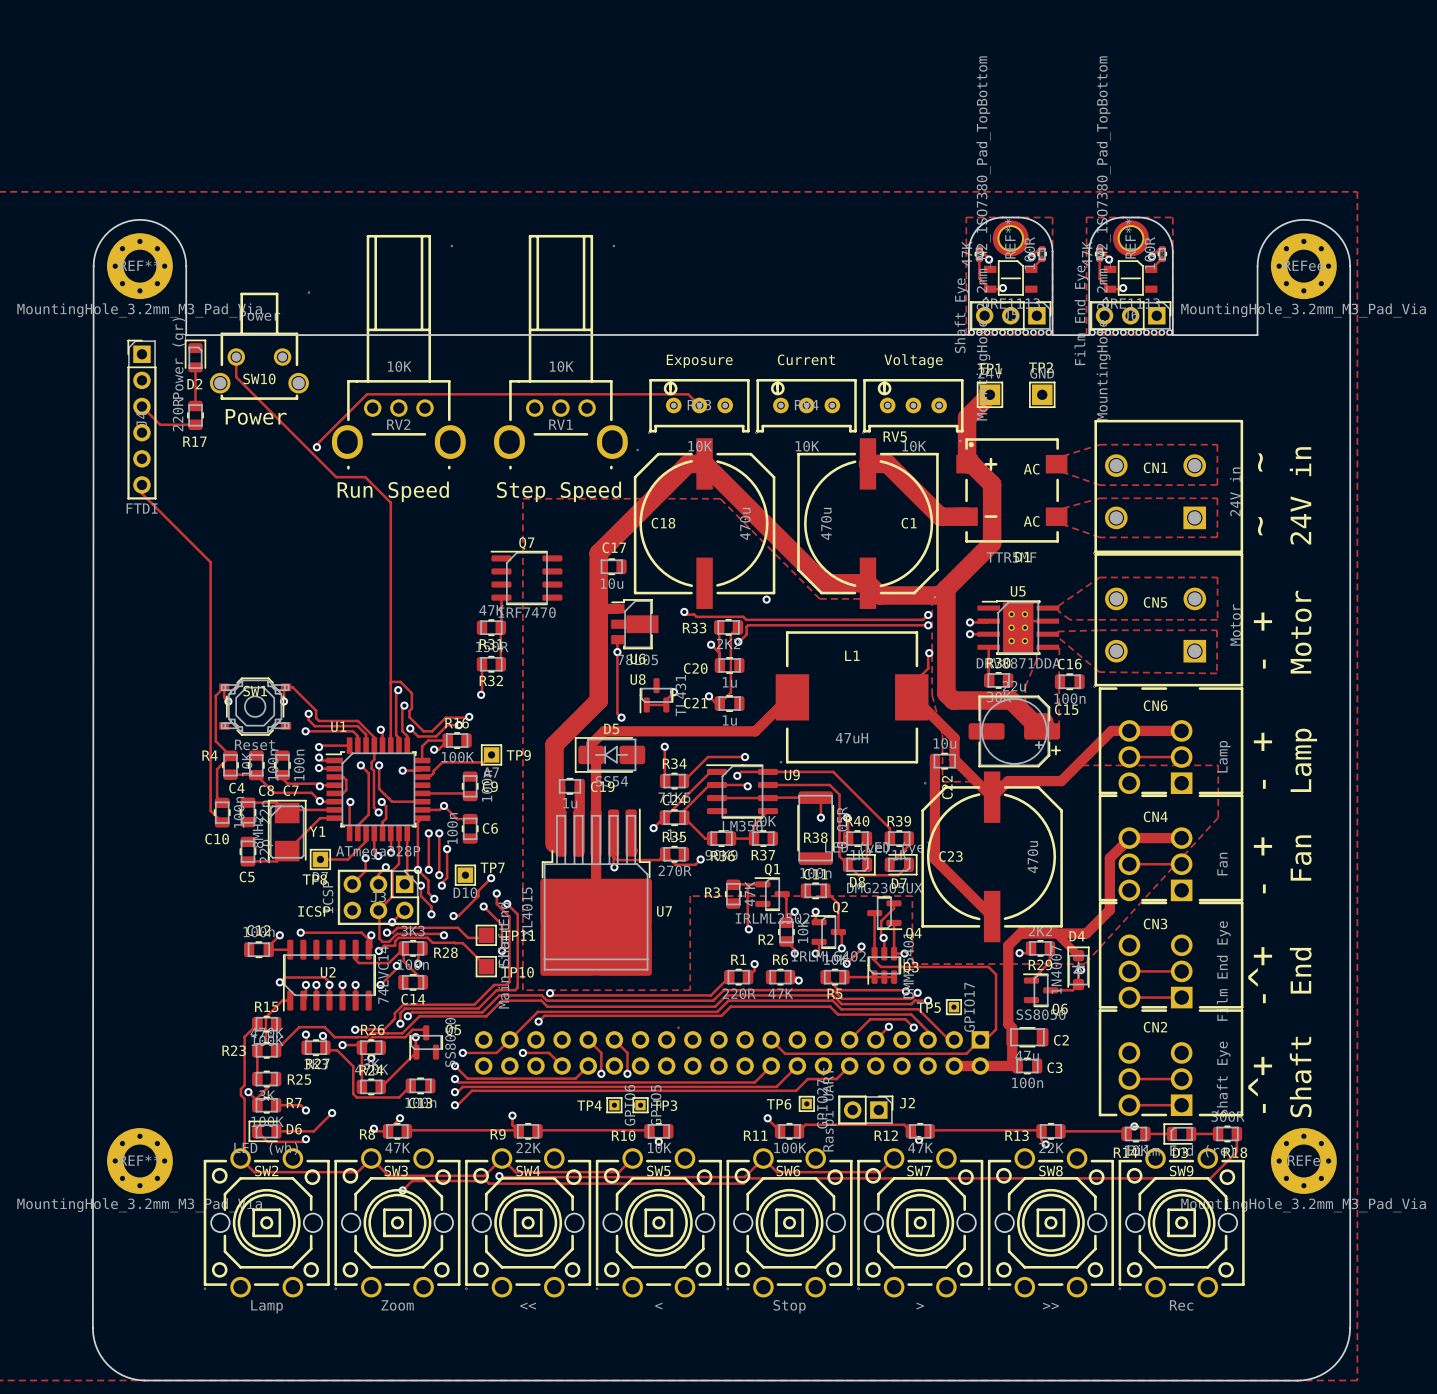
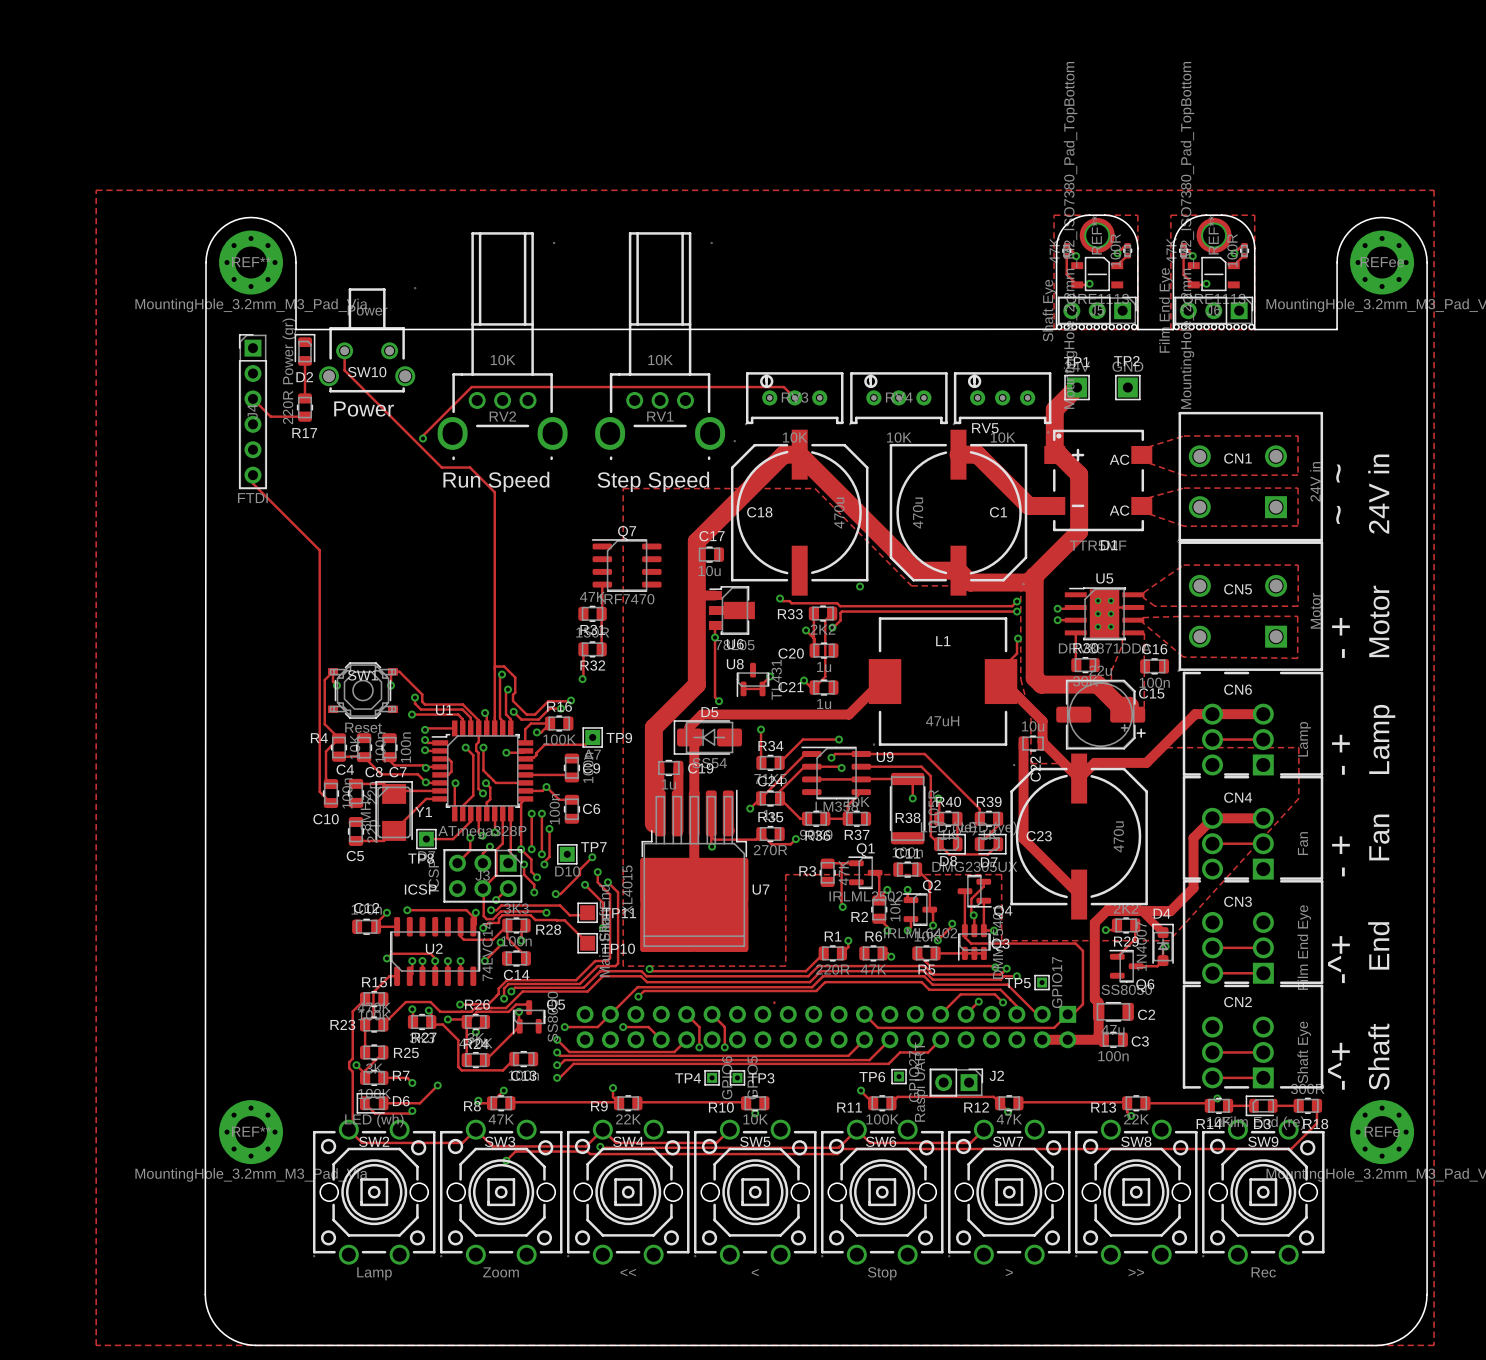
text: Current (806, 359) -> none
text: Exposure (699, 361) -> none
text: Voltage (913, 361) -> none

